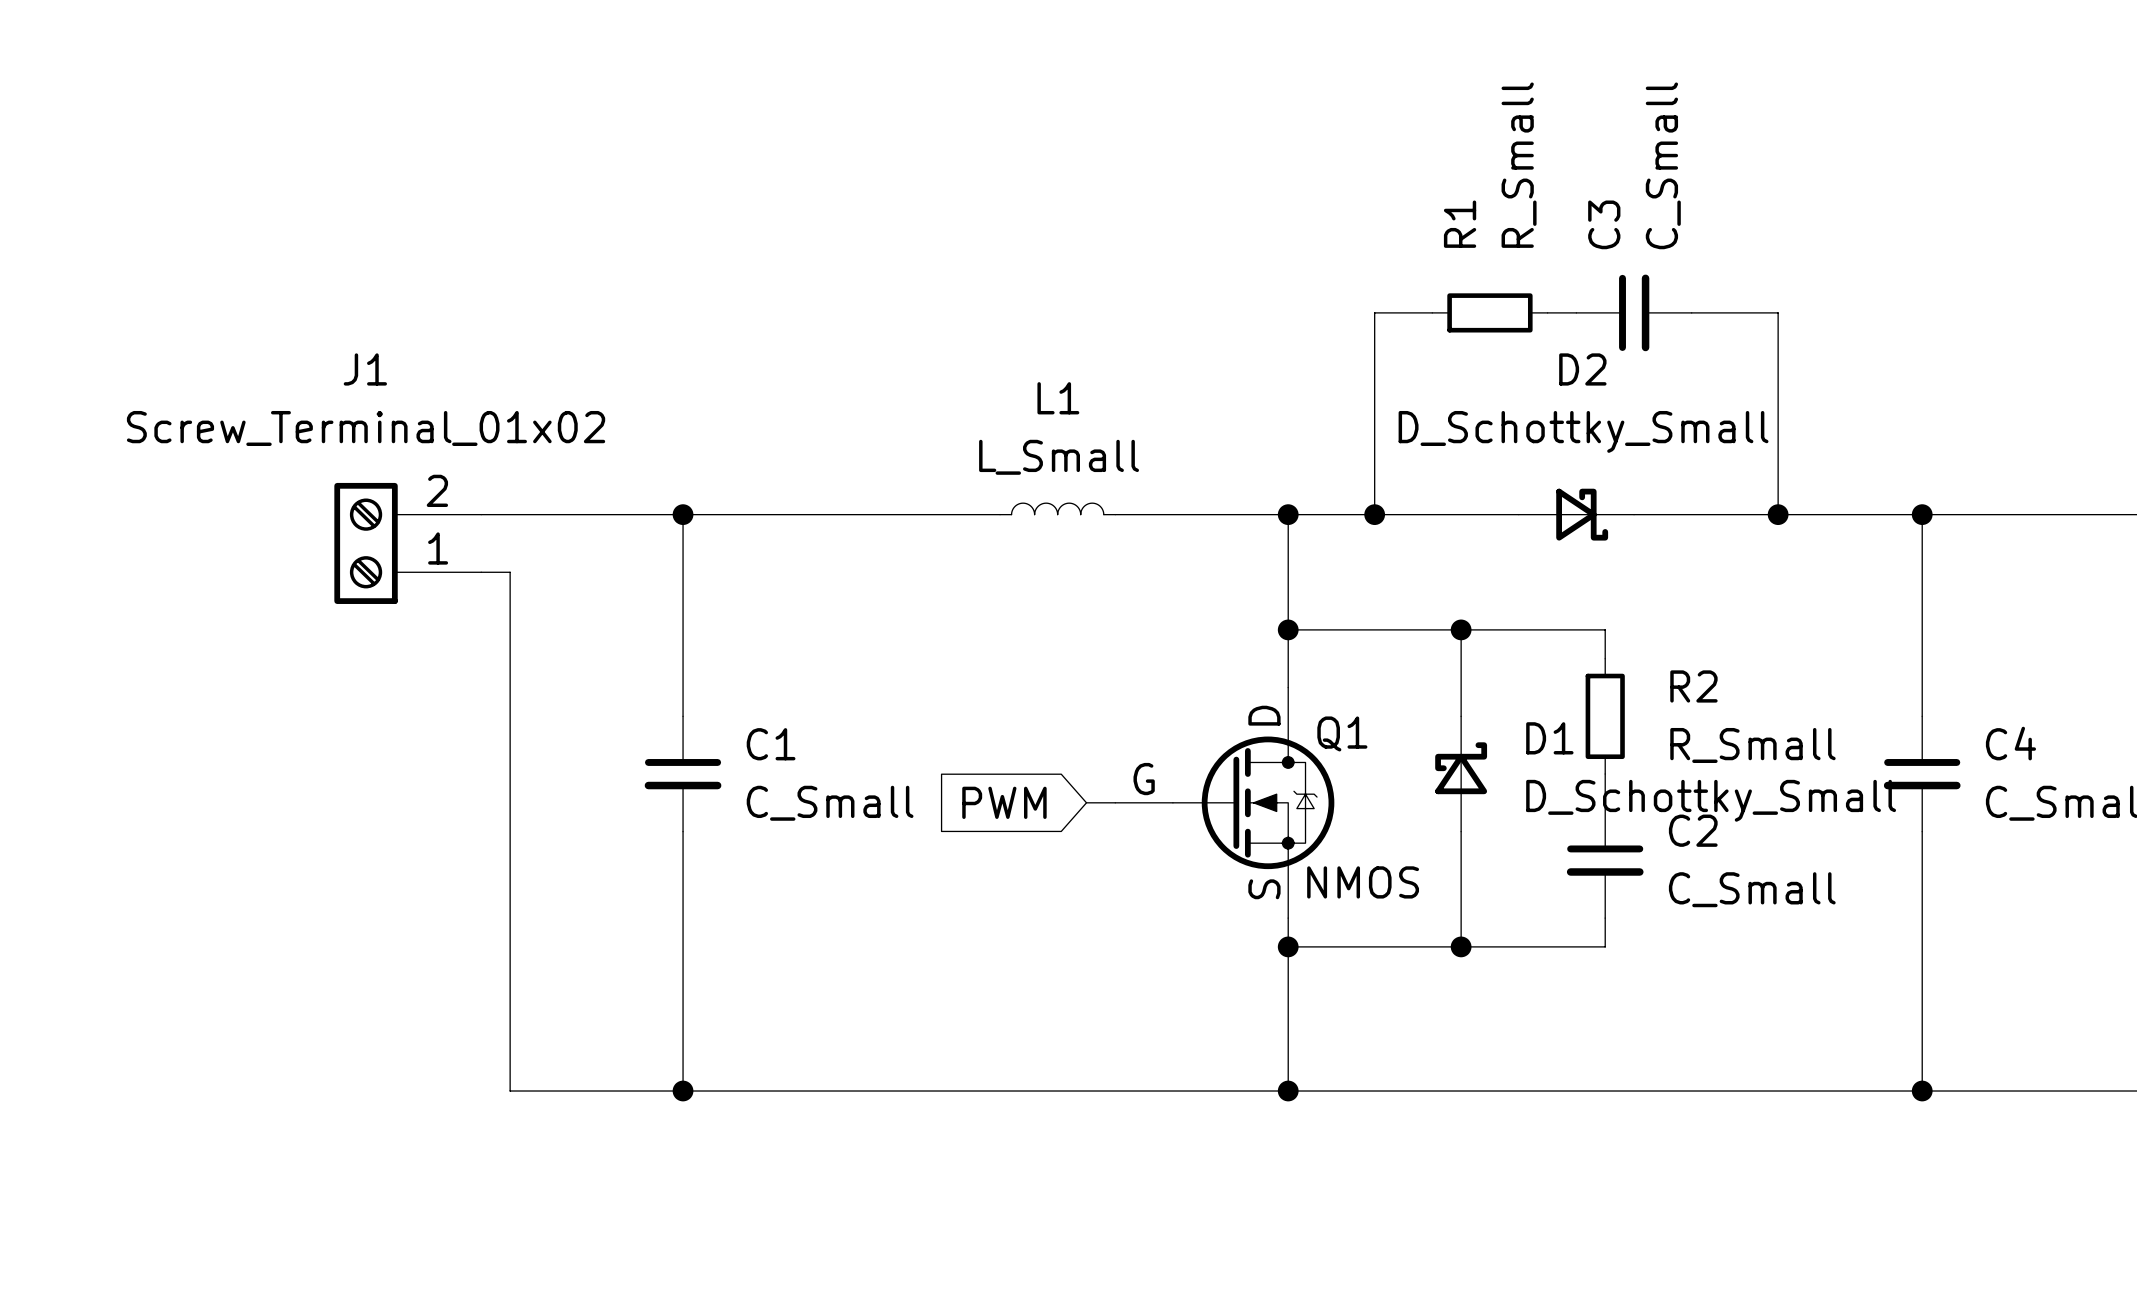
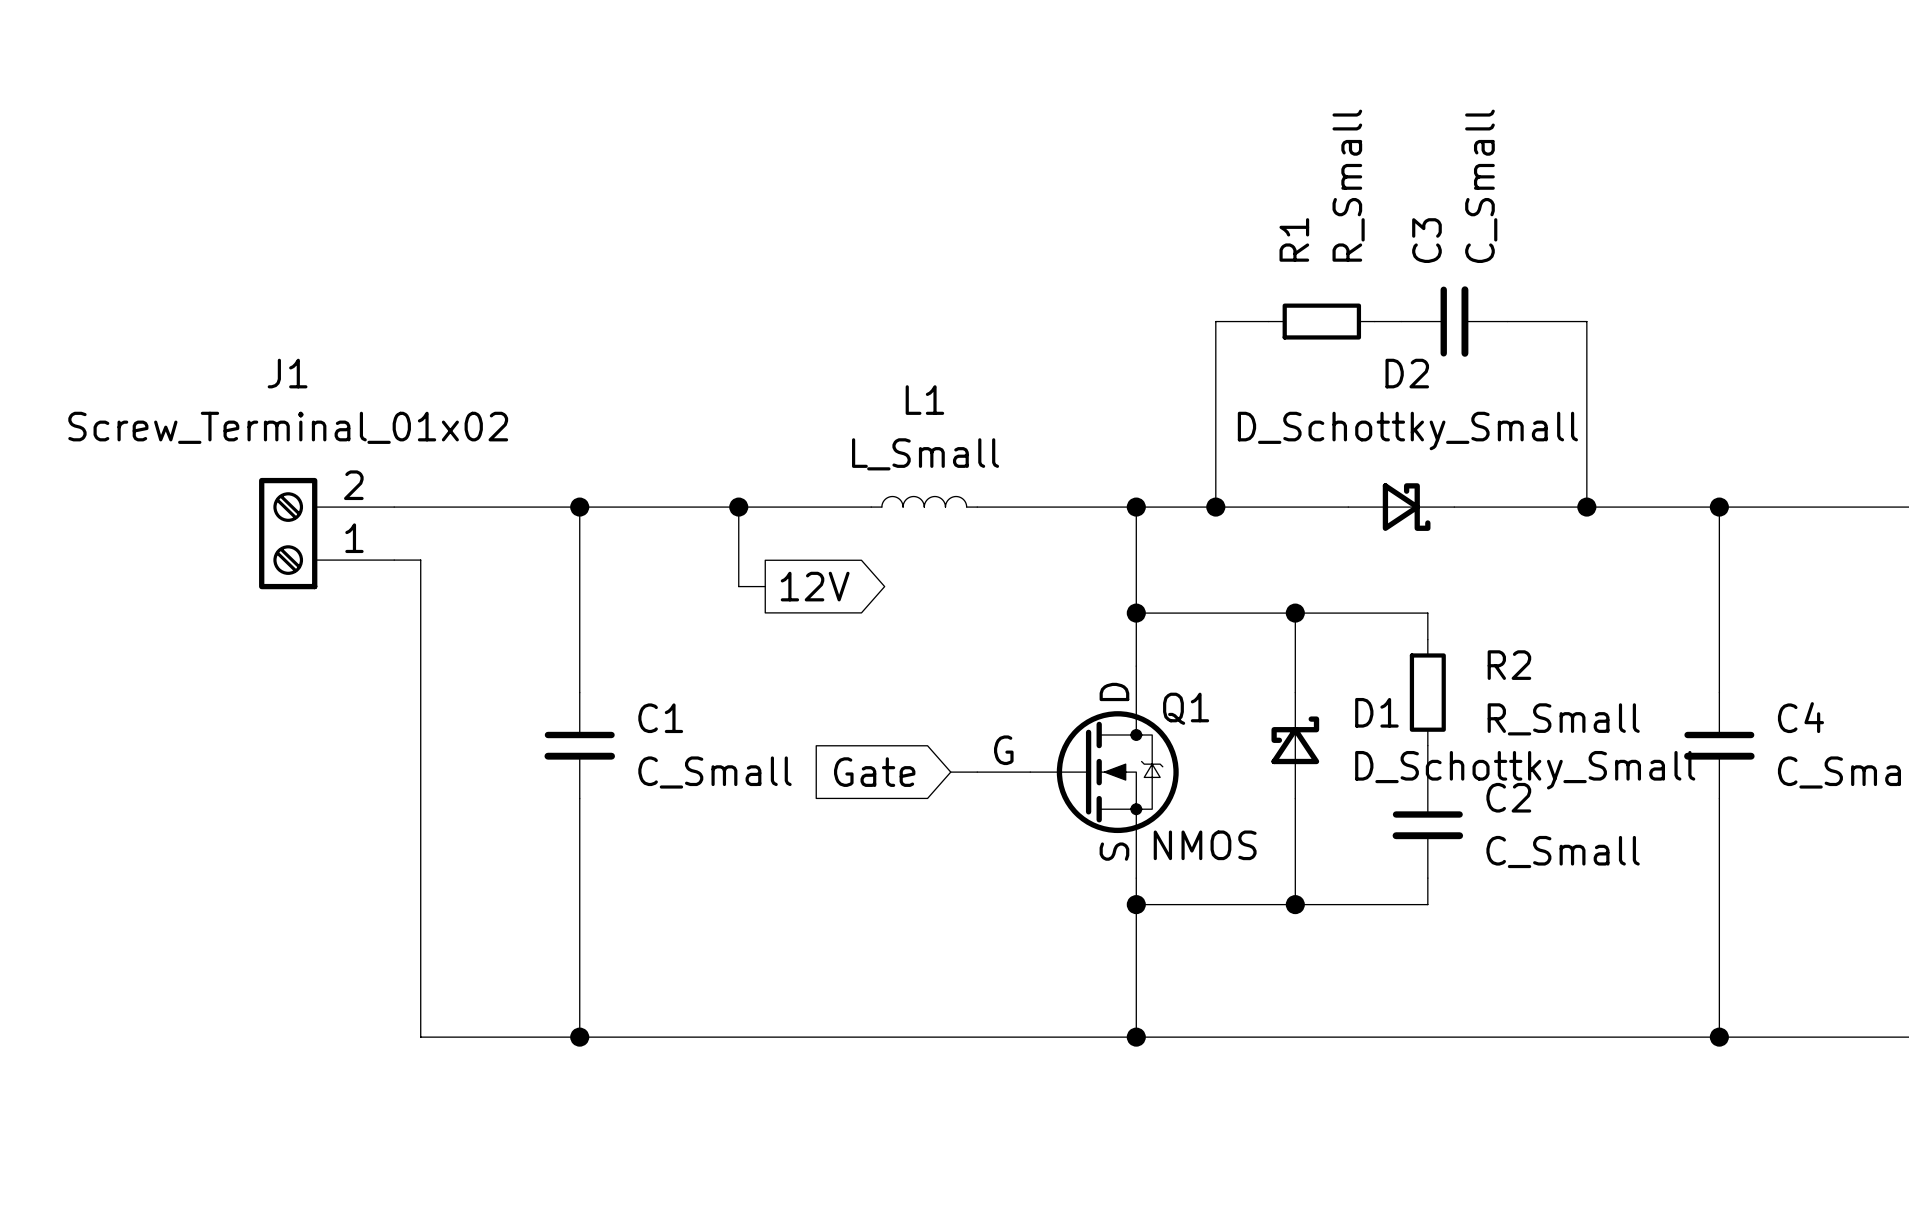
wire: none -> (738, 507) (738, 586) (765, 586)
junction: none -> (738, 507)
global label: none -> 12V (815, 586)
global label: PWM (1004, 802) -> Gate (874, 772)

